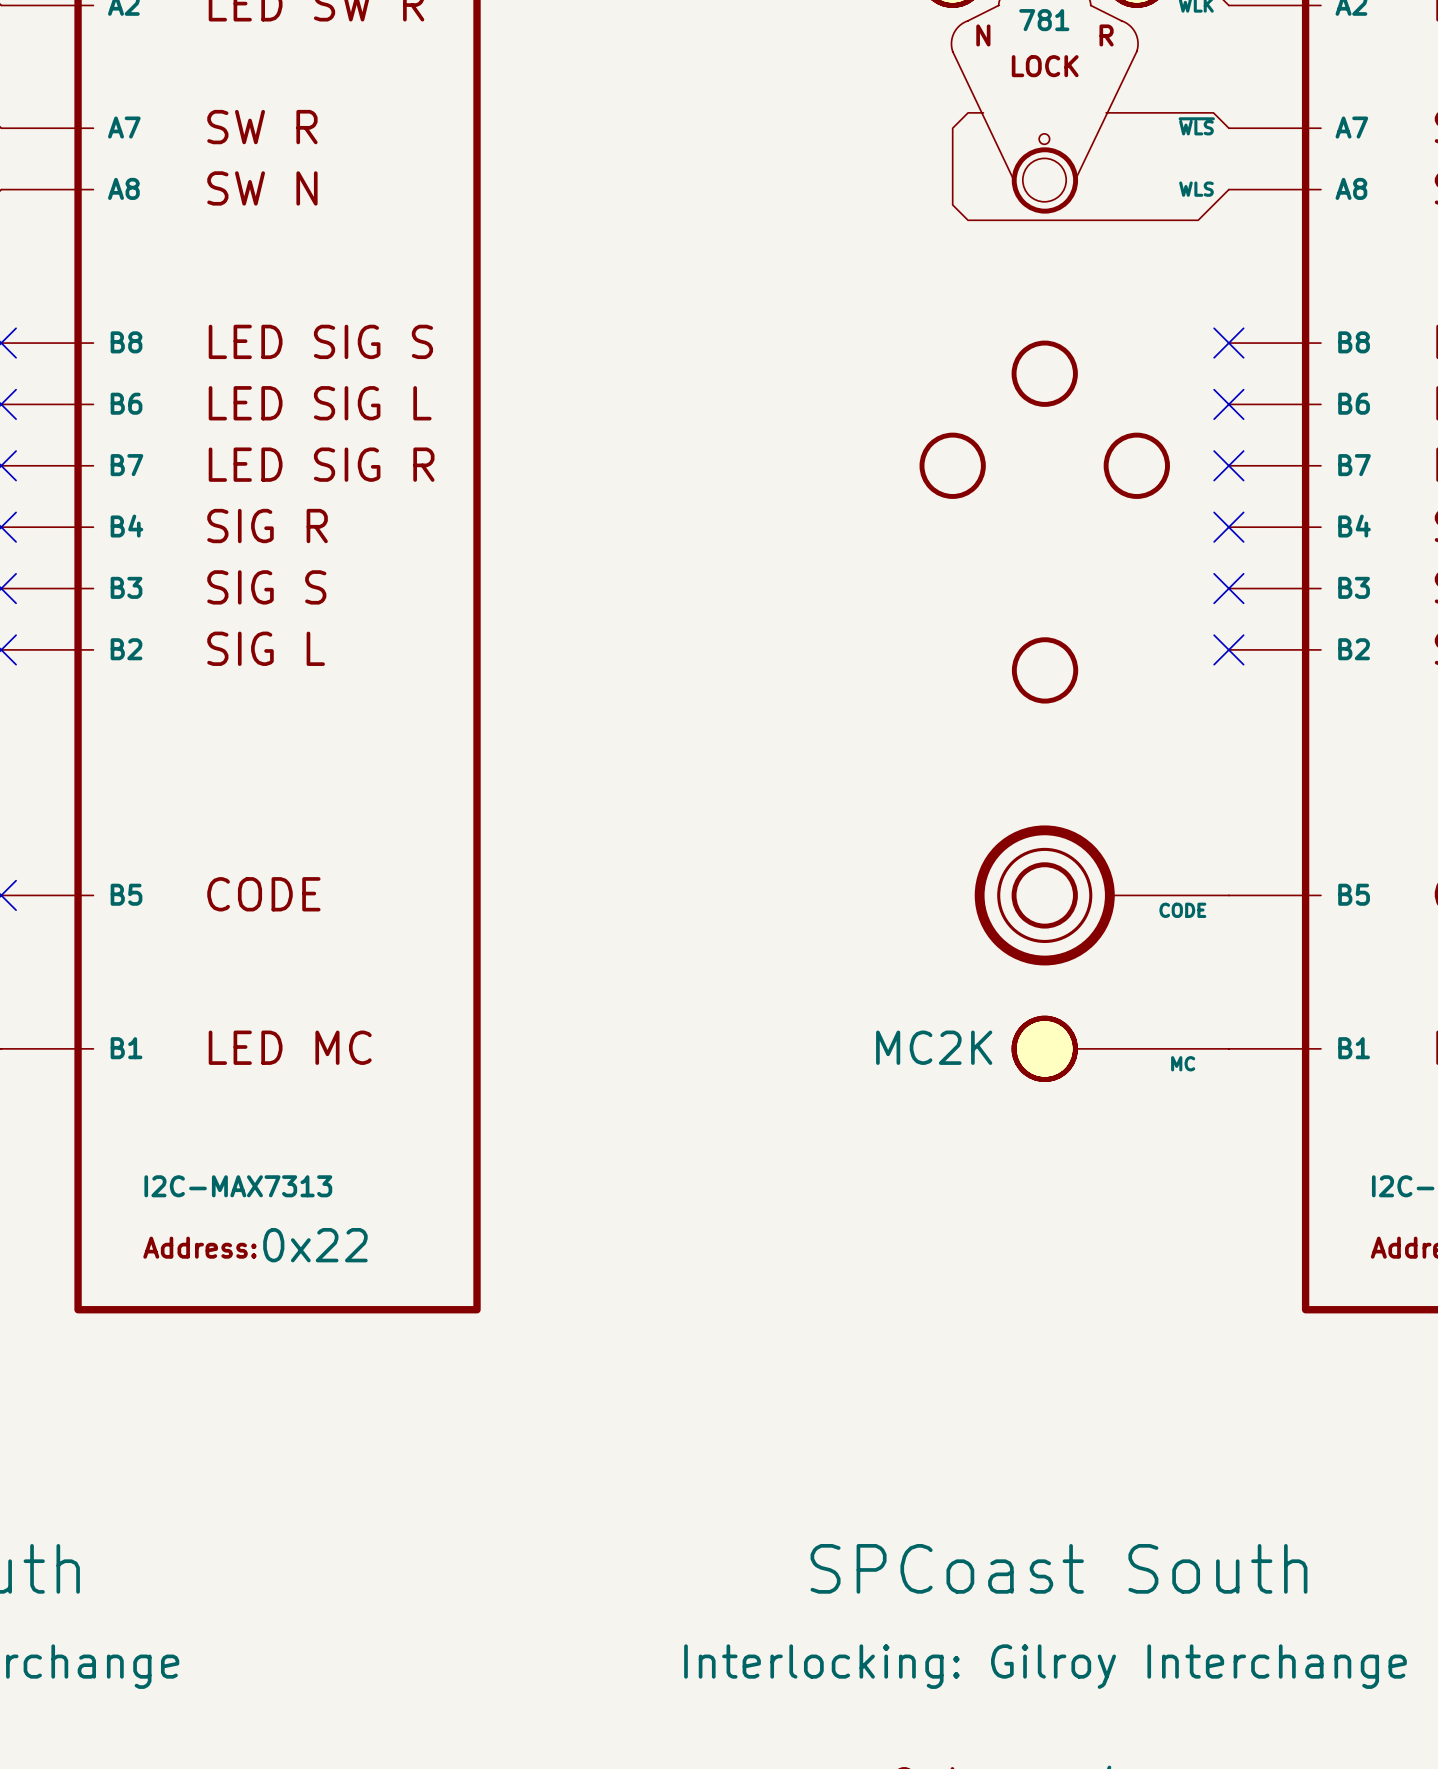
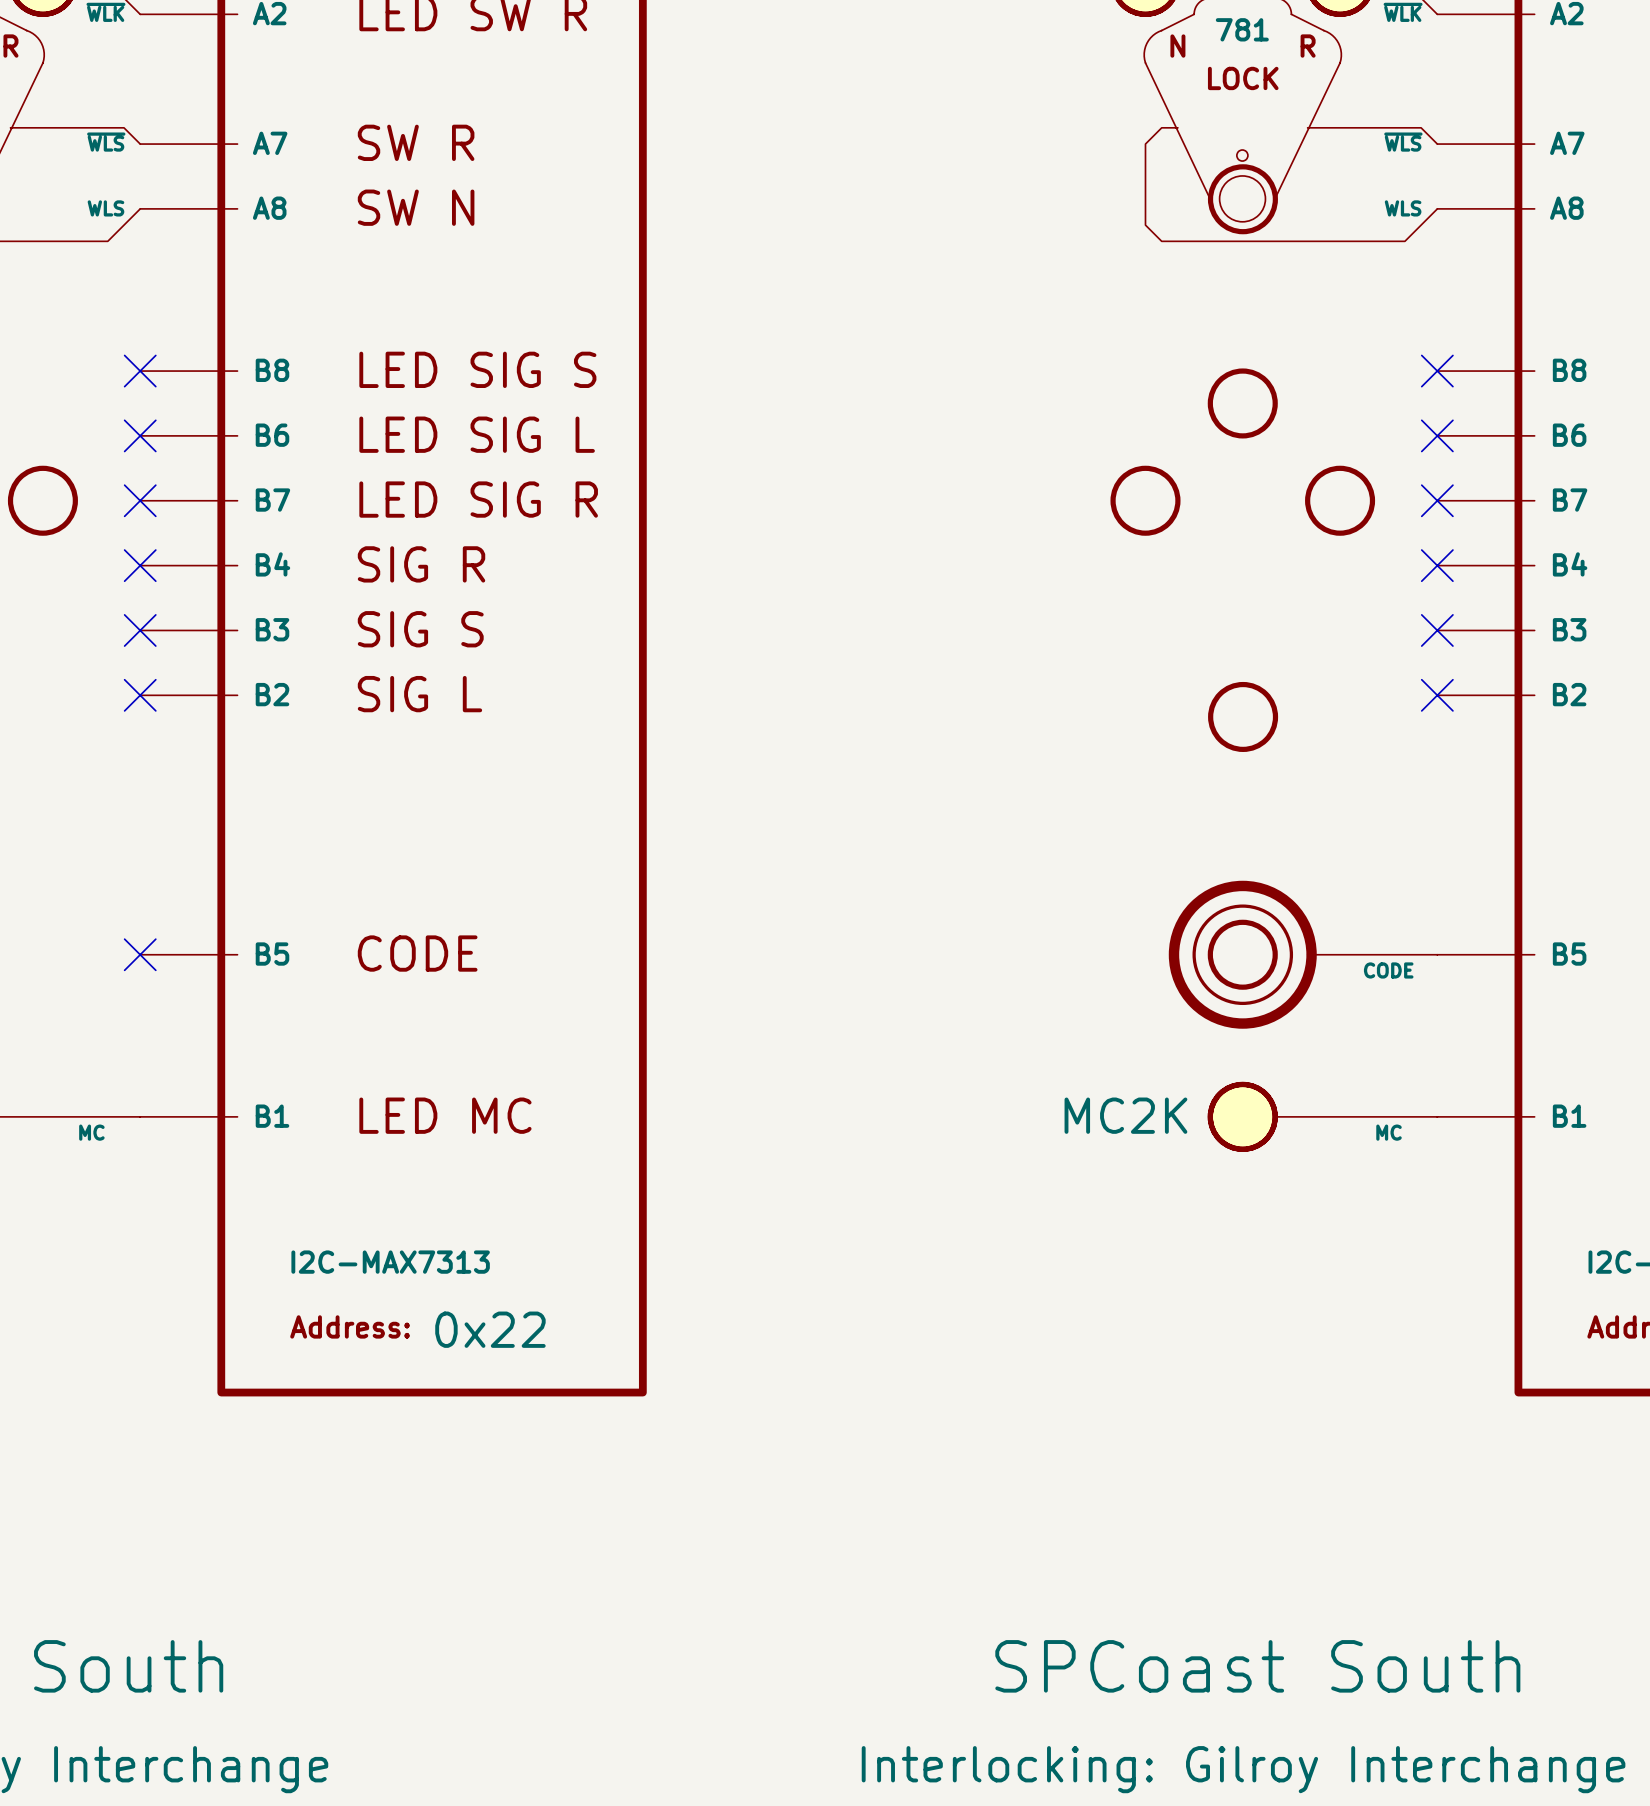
part text position: 0x22 (315, 1245) -> 0x22 (490, 1329)

